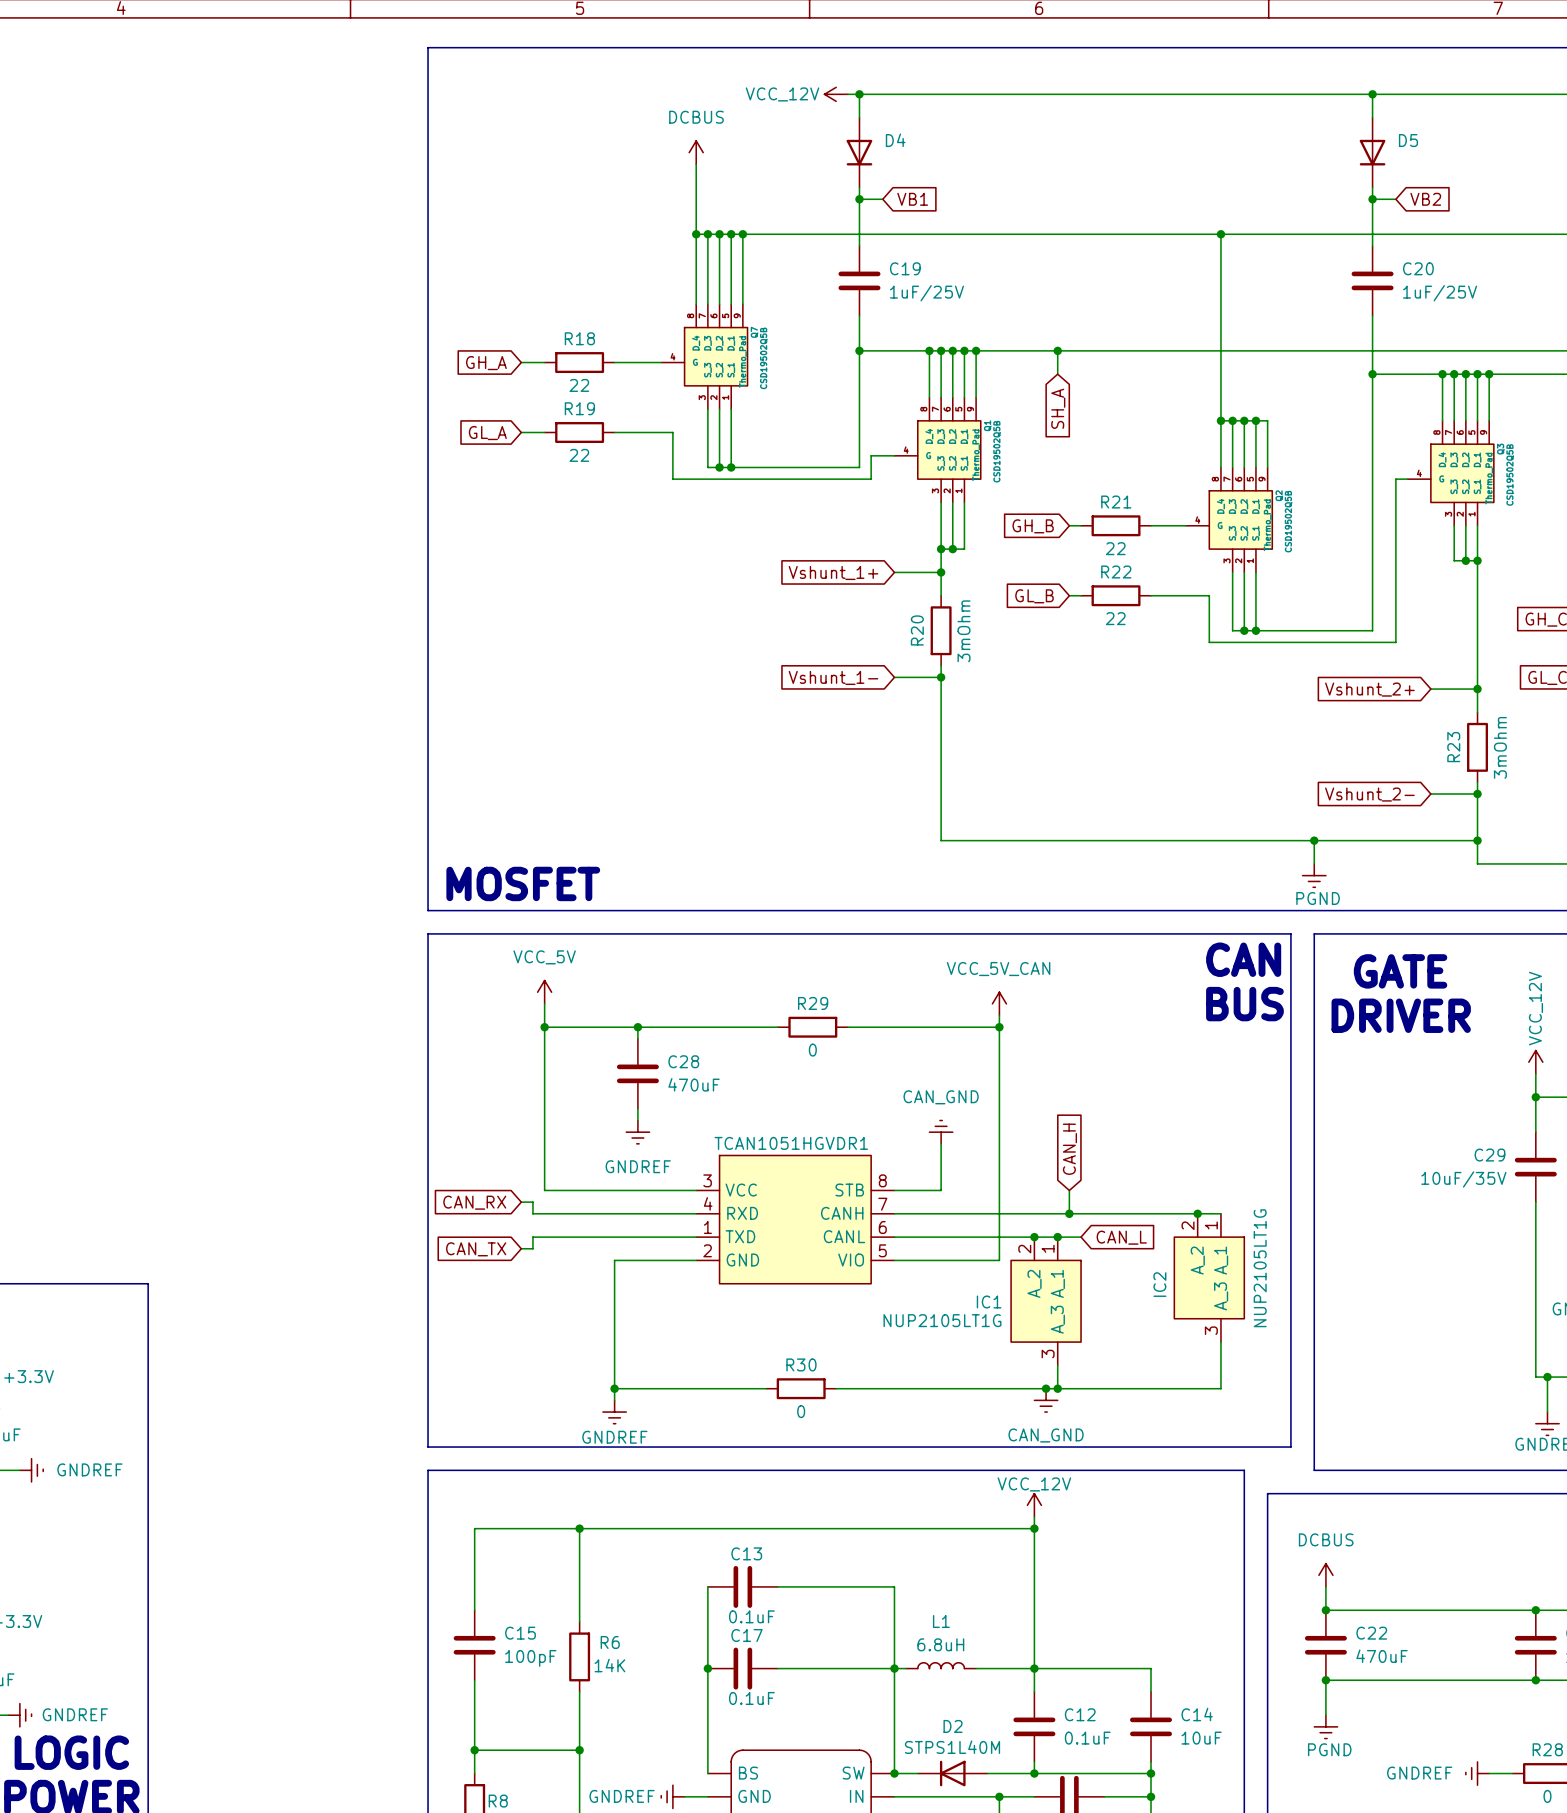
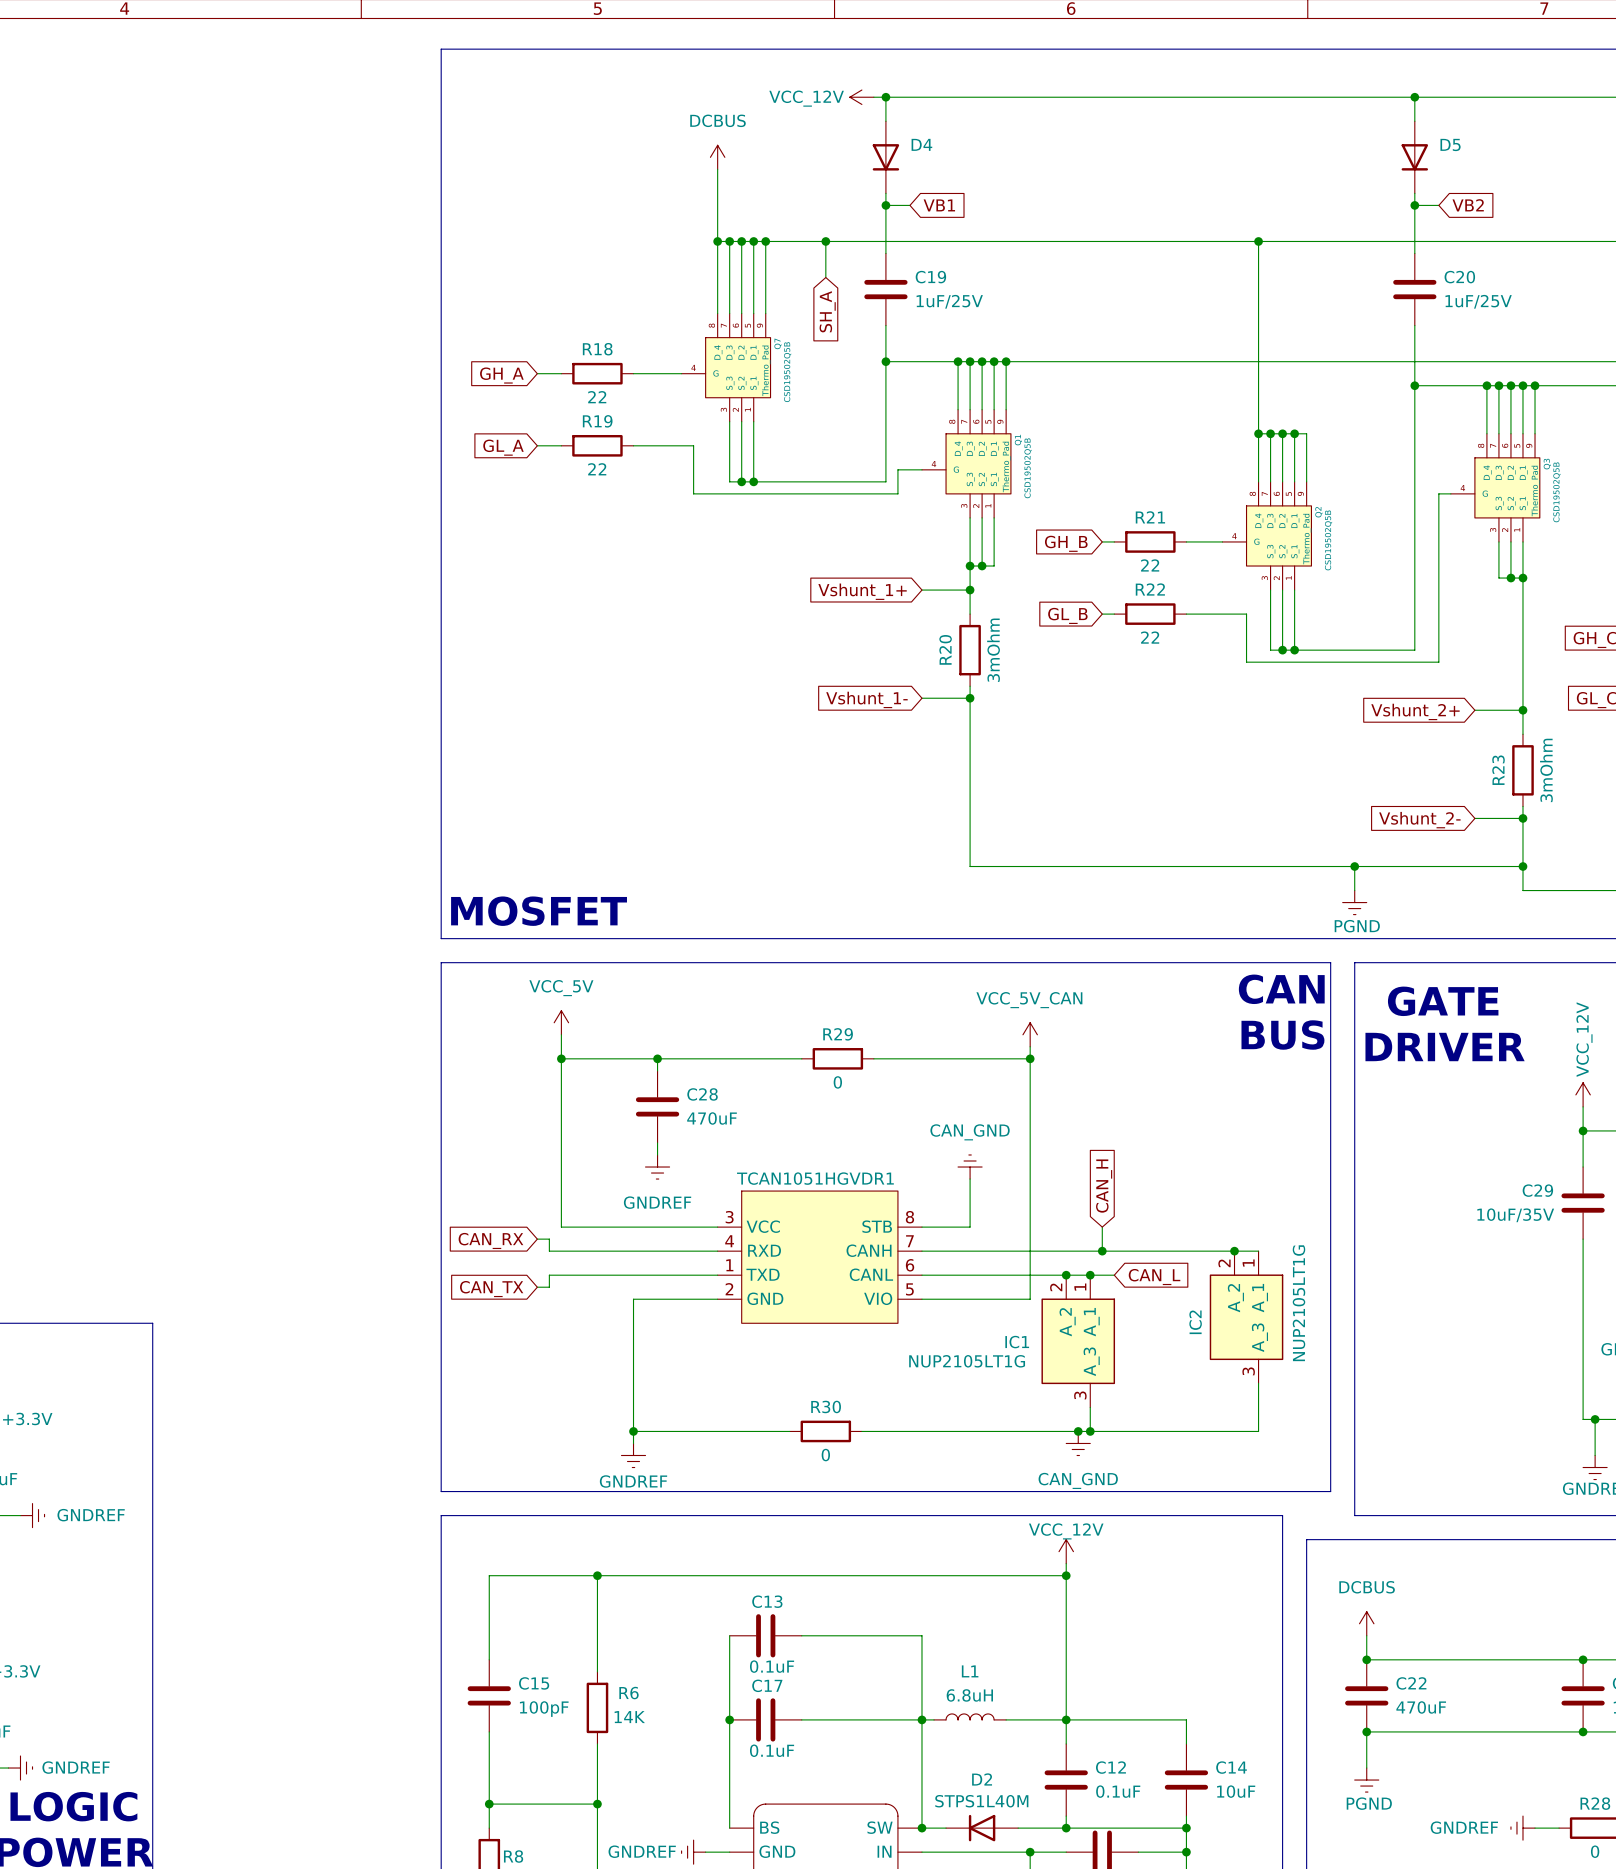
wire: none -> (825, 241) (825, 277)
junction: none -> (825, 241)
global label: none -> SH_A (827, 311)
wire: (1057, 350) (1057, 374) -> none
junction: (1057, 350) -> none
global label: SH_A (1058, 408) -> none

